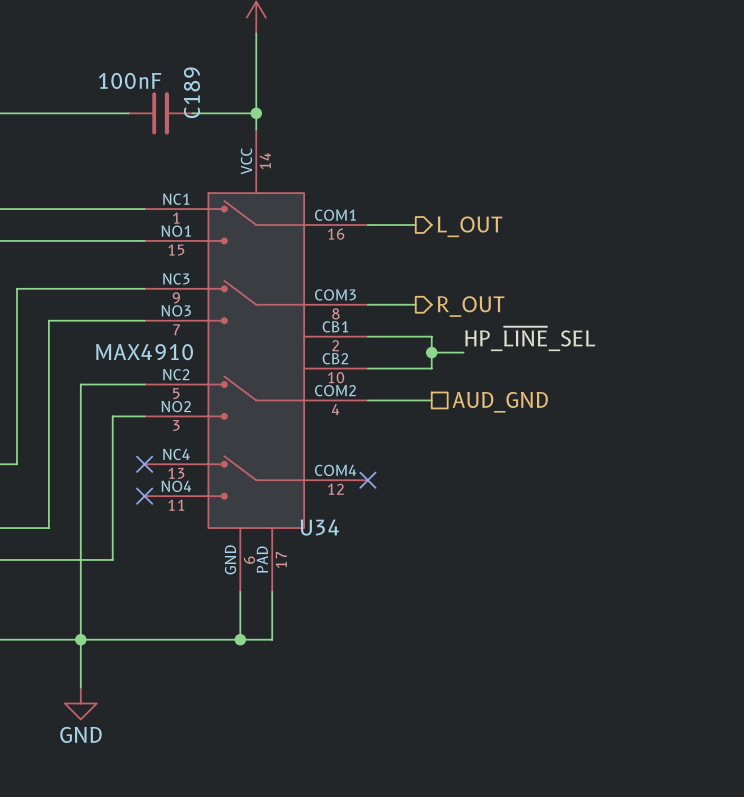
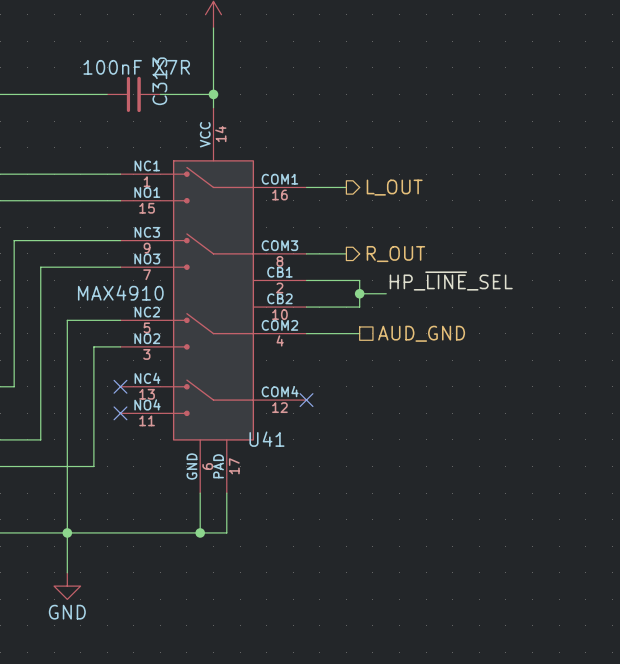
C189 value: 100nF (130, 80) -> 100nF X7R (136, 67)
C189 name: C189 (191, 92) -> C313 (159, 81)
U34 name: U34 (319, 527) -> U41 (266, 439)

